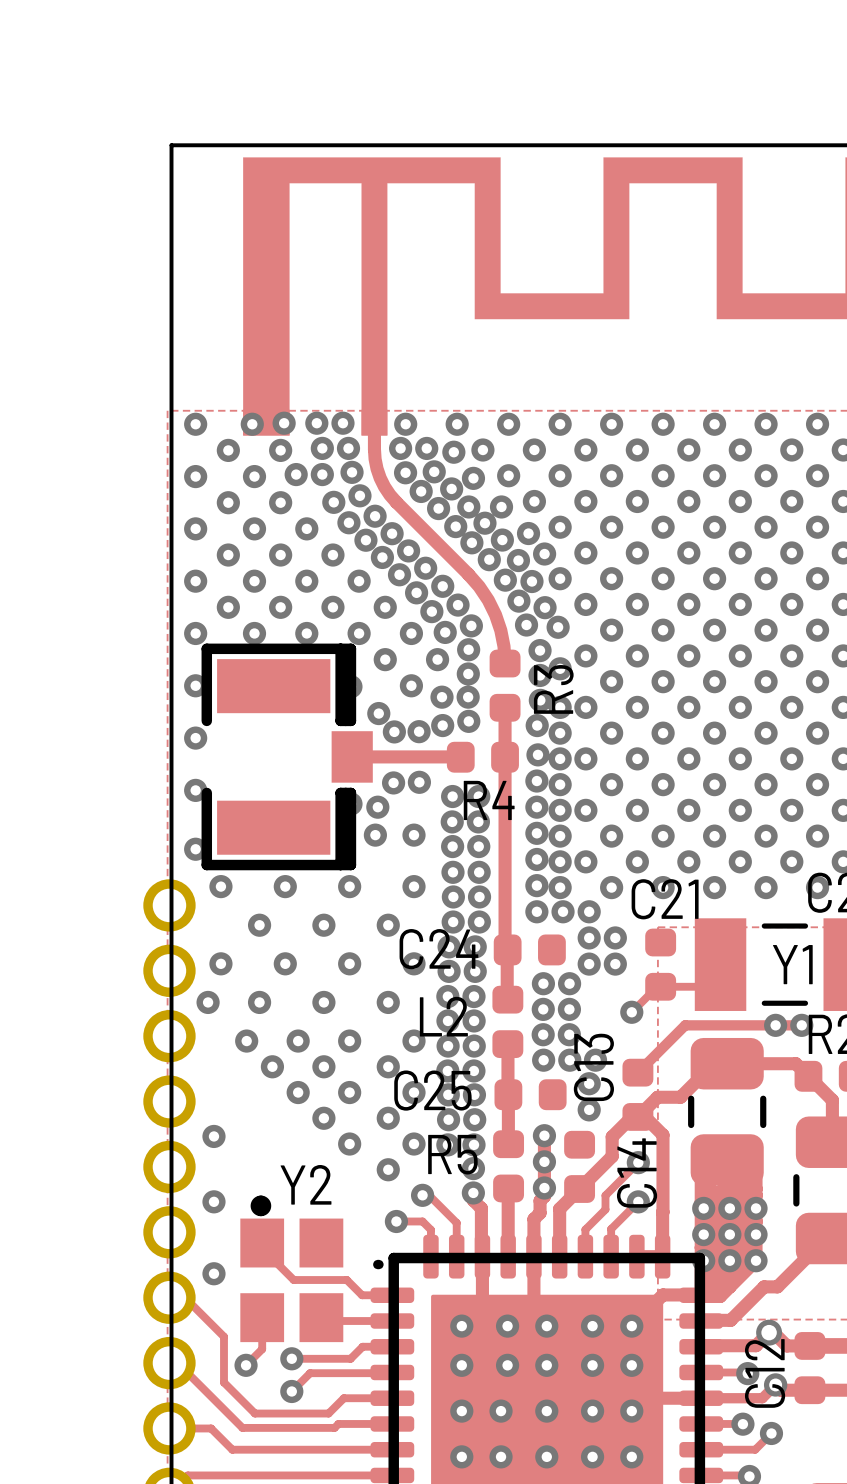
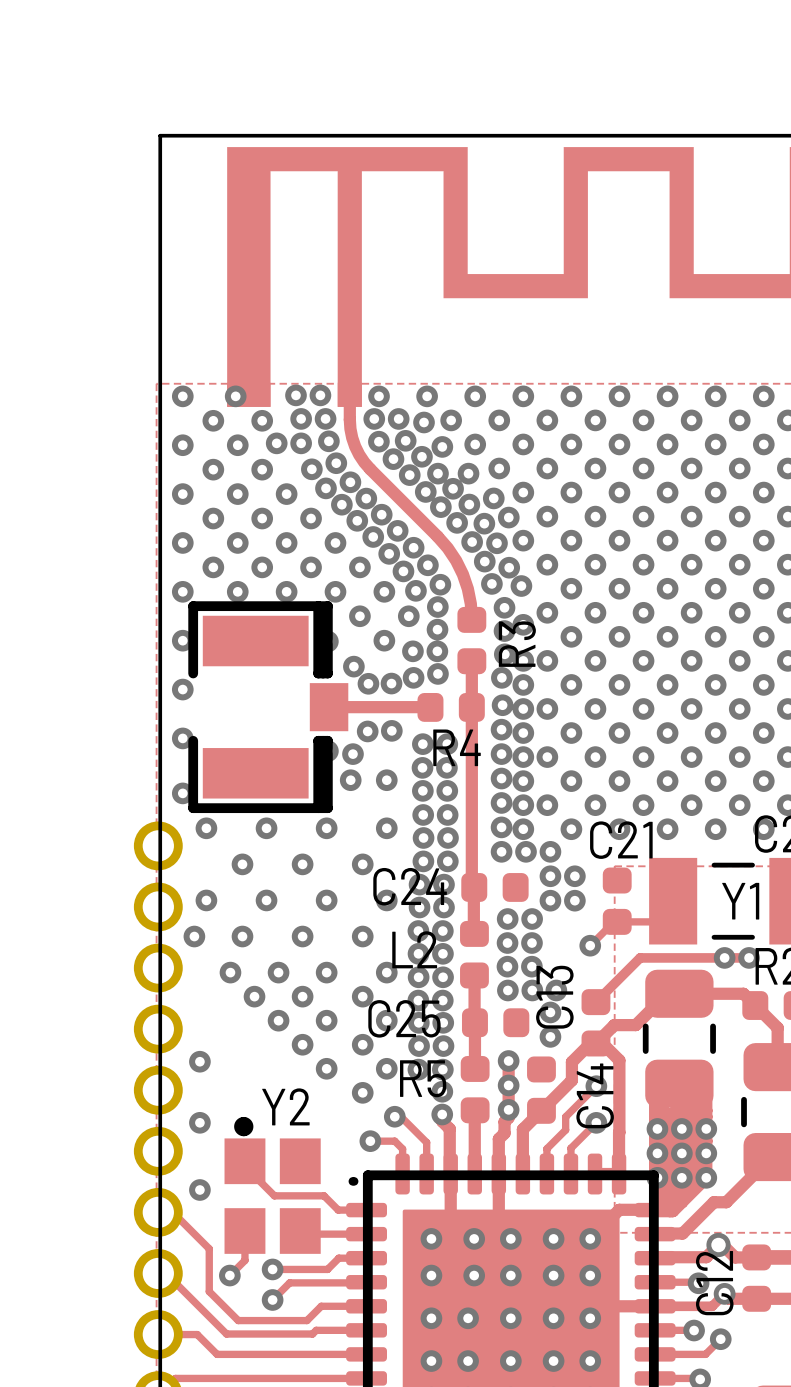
via: (284, 423) -> none

